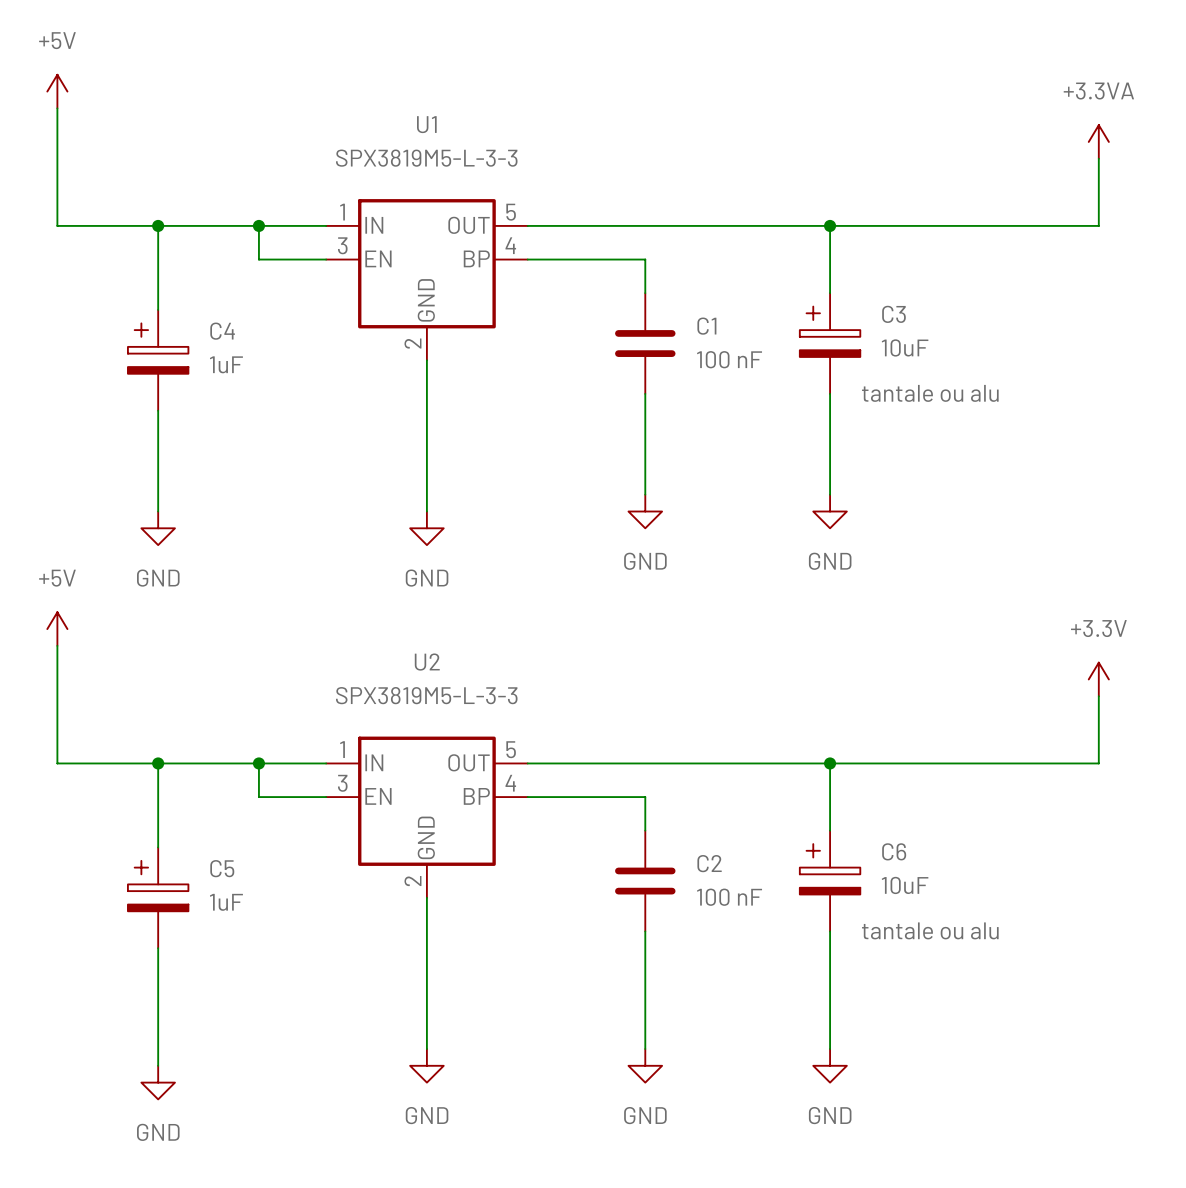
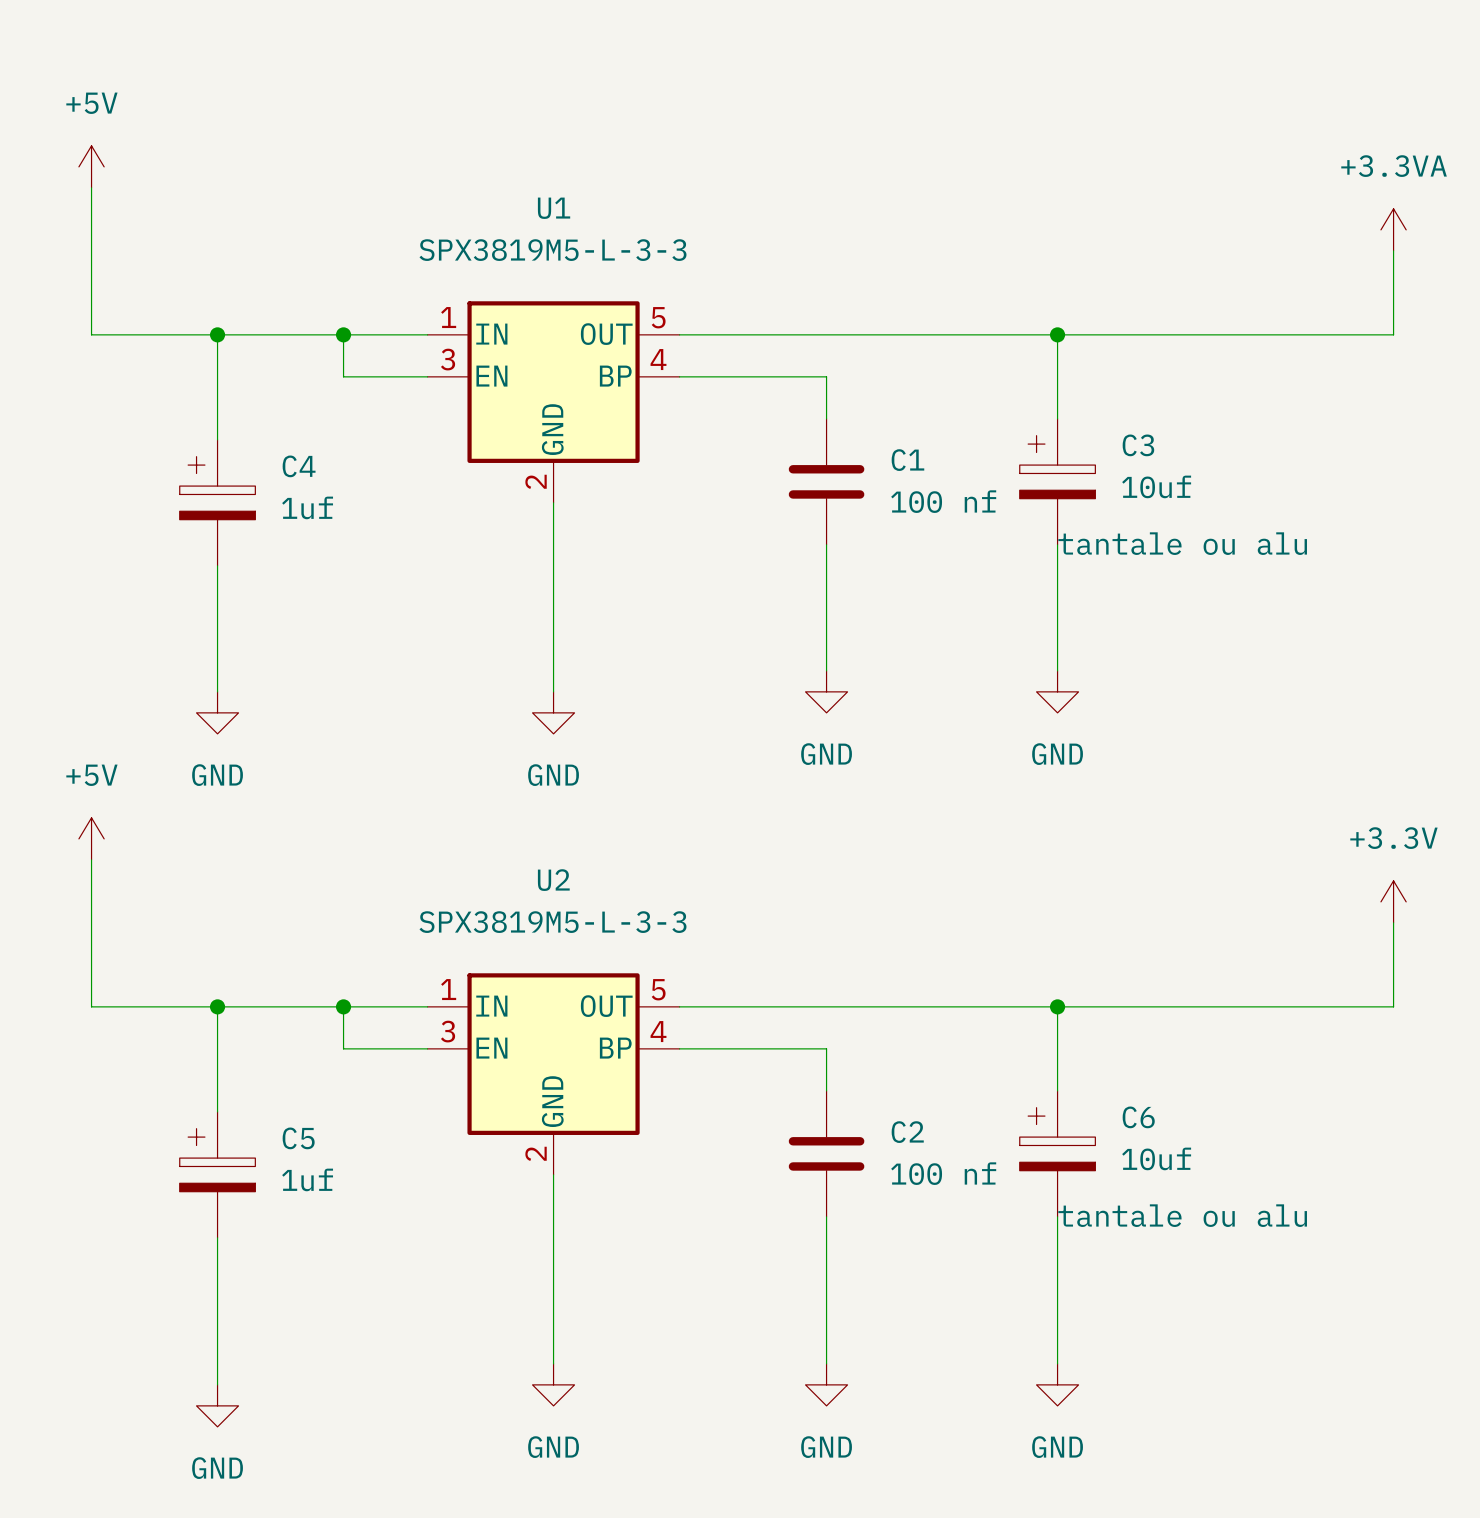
C3 value: 10uF (905, 347) -> 10uf (1156, 486)
C1 value: 100 nF (729, 359) -> 100 nf (943, 501)
C4 value: 1uF (226, 364) -> 1uf (307, 507)
C6 value: 10uF (905, 885) -> 10uf (1156, 1158)
C2 value: 100 nF (729, 897) -> 100 nf (943, 1173)
C5 value: 1uF (226, 902) -> 1uf (307, 1179)

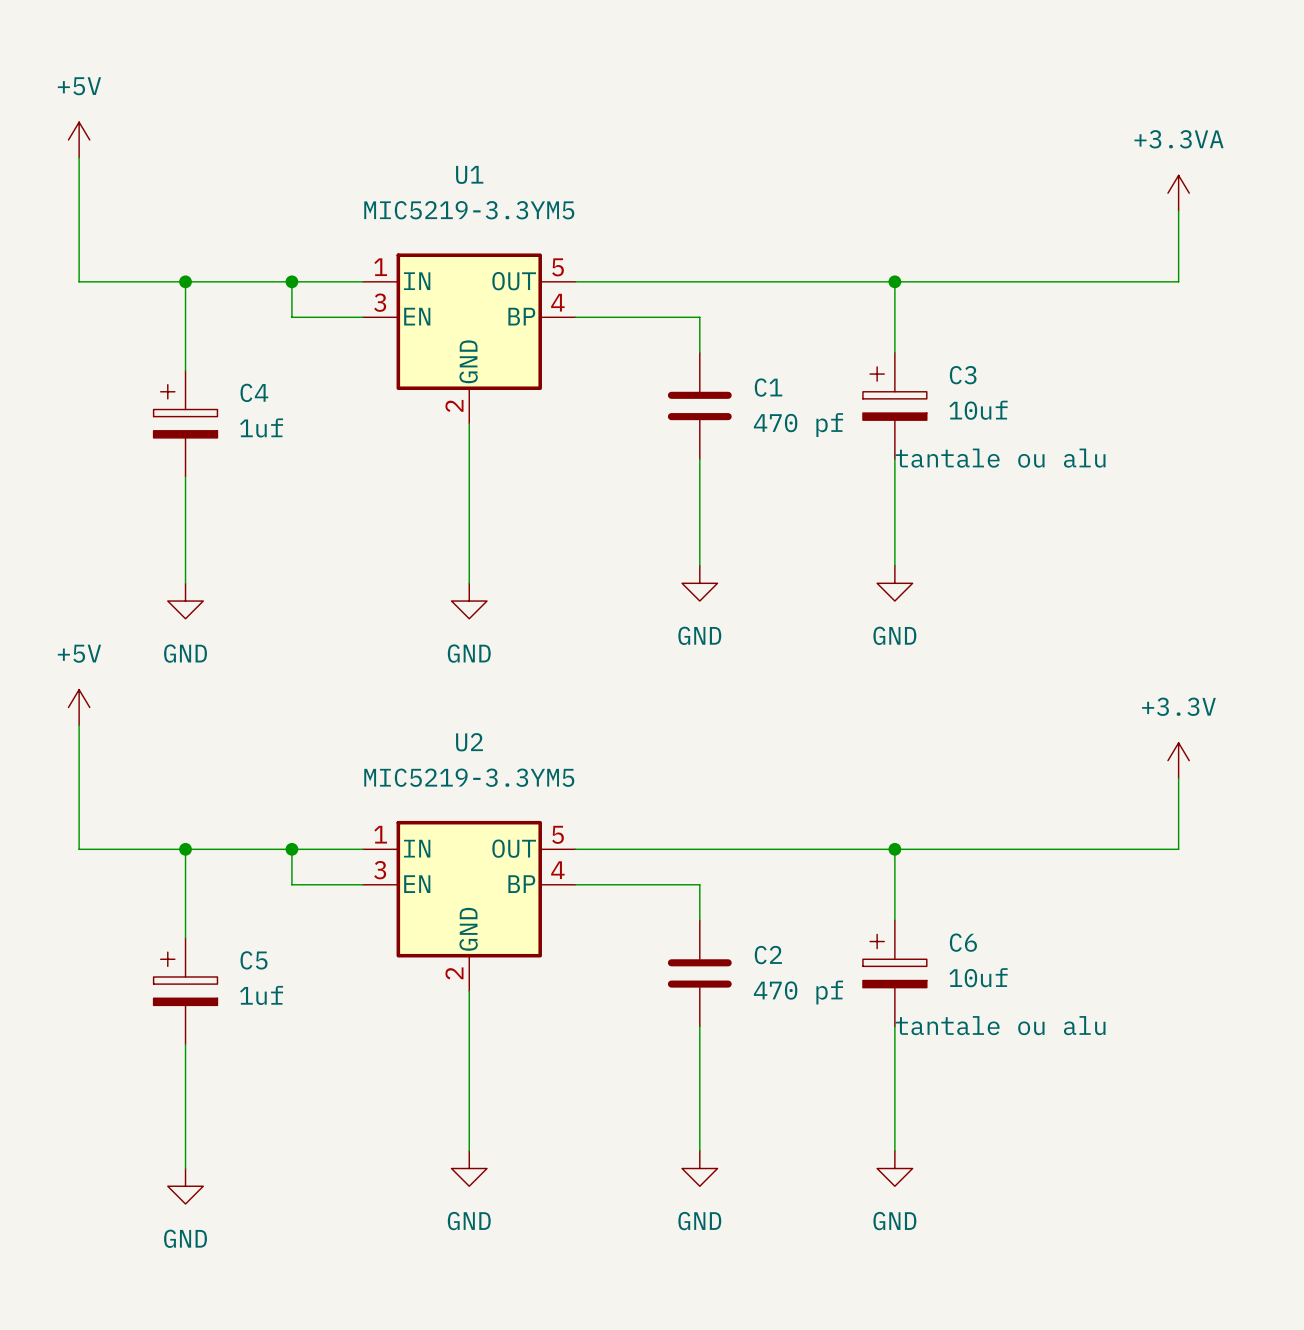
U1 value: SPX3819M5-L-3-3 (552, 250) -> MIC5219-3.3YM5 (469, 210)
C1 value: 100 nf (943, 501) -> 470 pf (798, 425)
U2 value: SPX3819M5-L-3-3 (552, 922) -> MIC5219-3.3YM5 (469, 777)
C2 value: 100 nf (943, 1173) -> 470 pf (798, 992)

